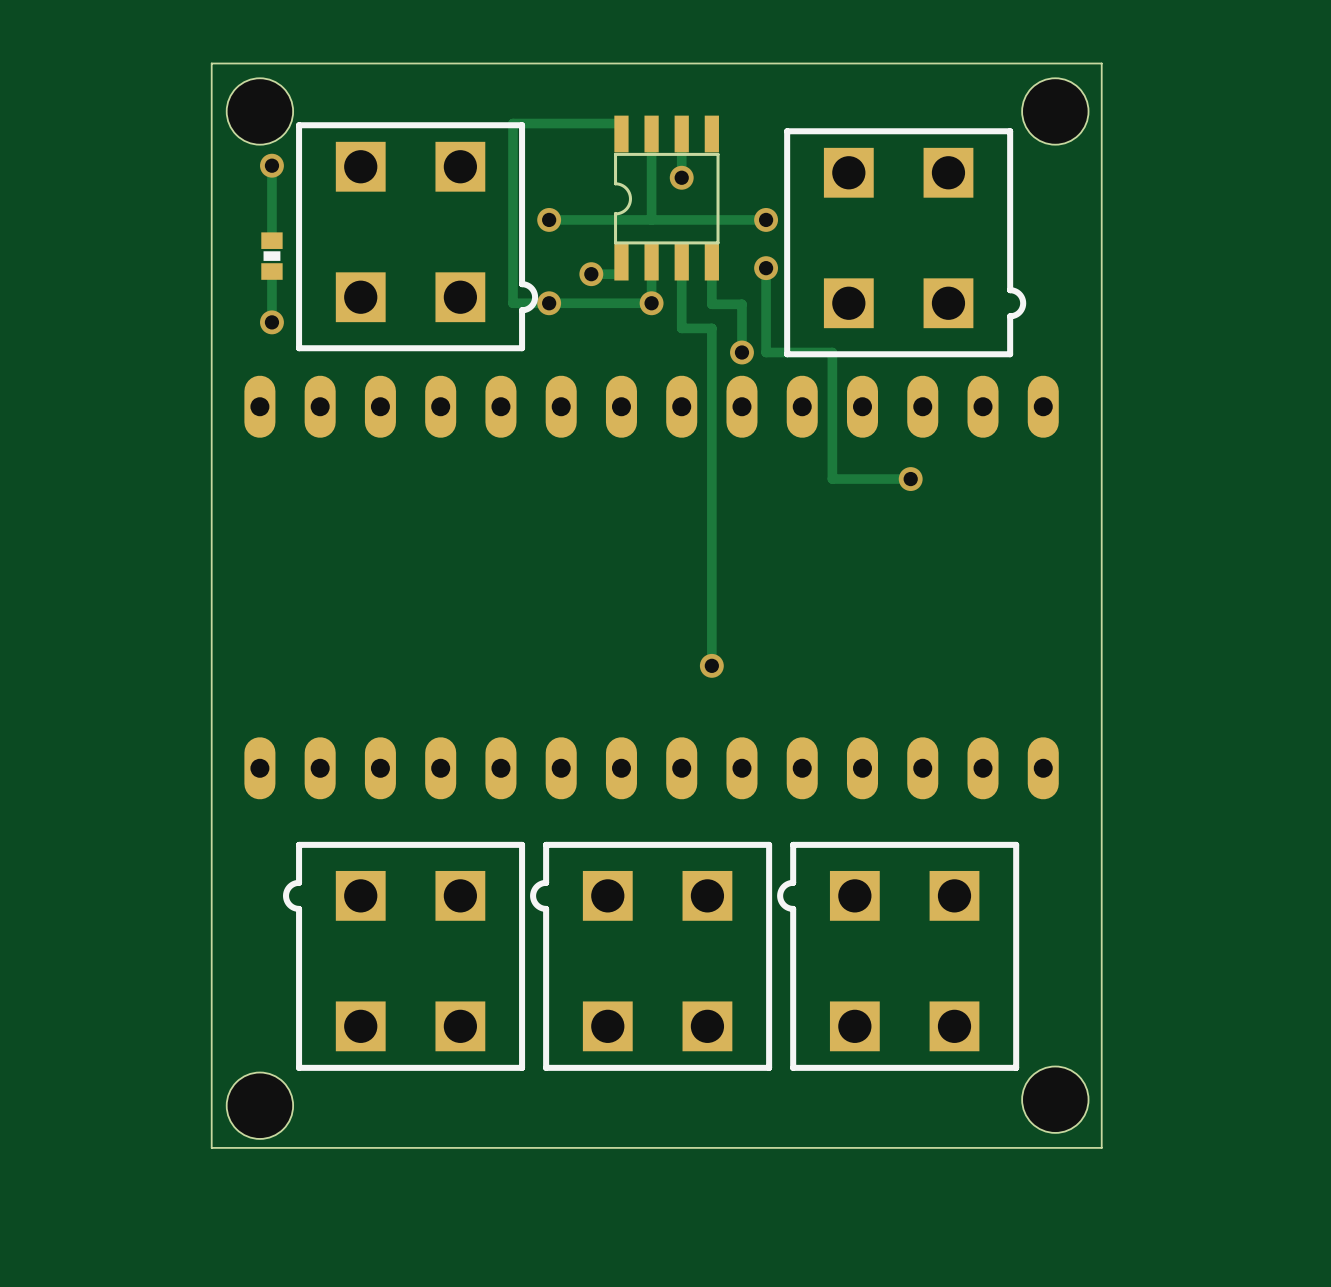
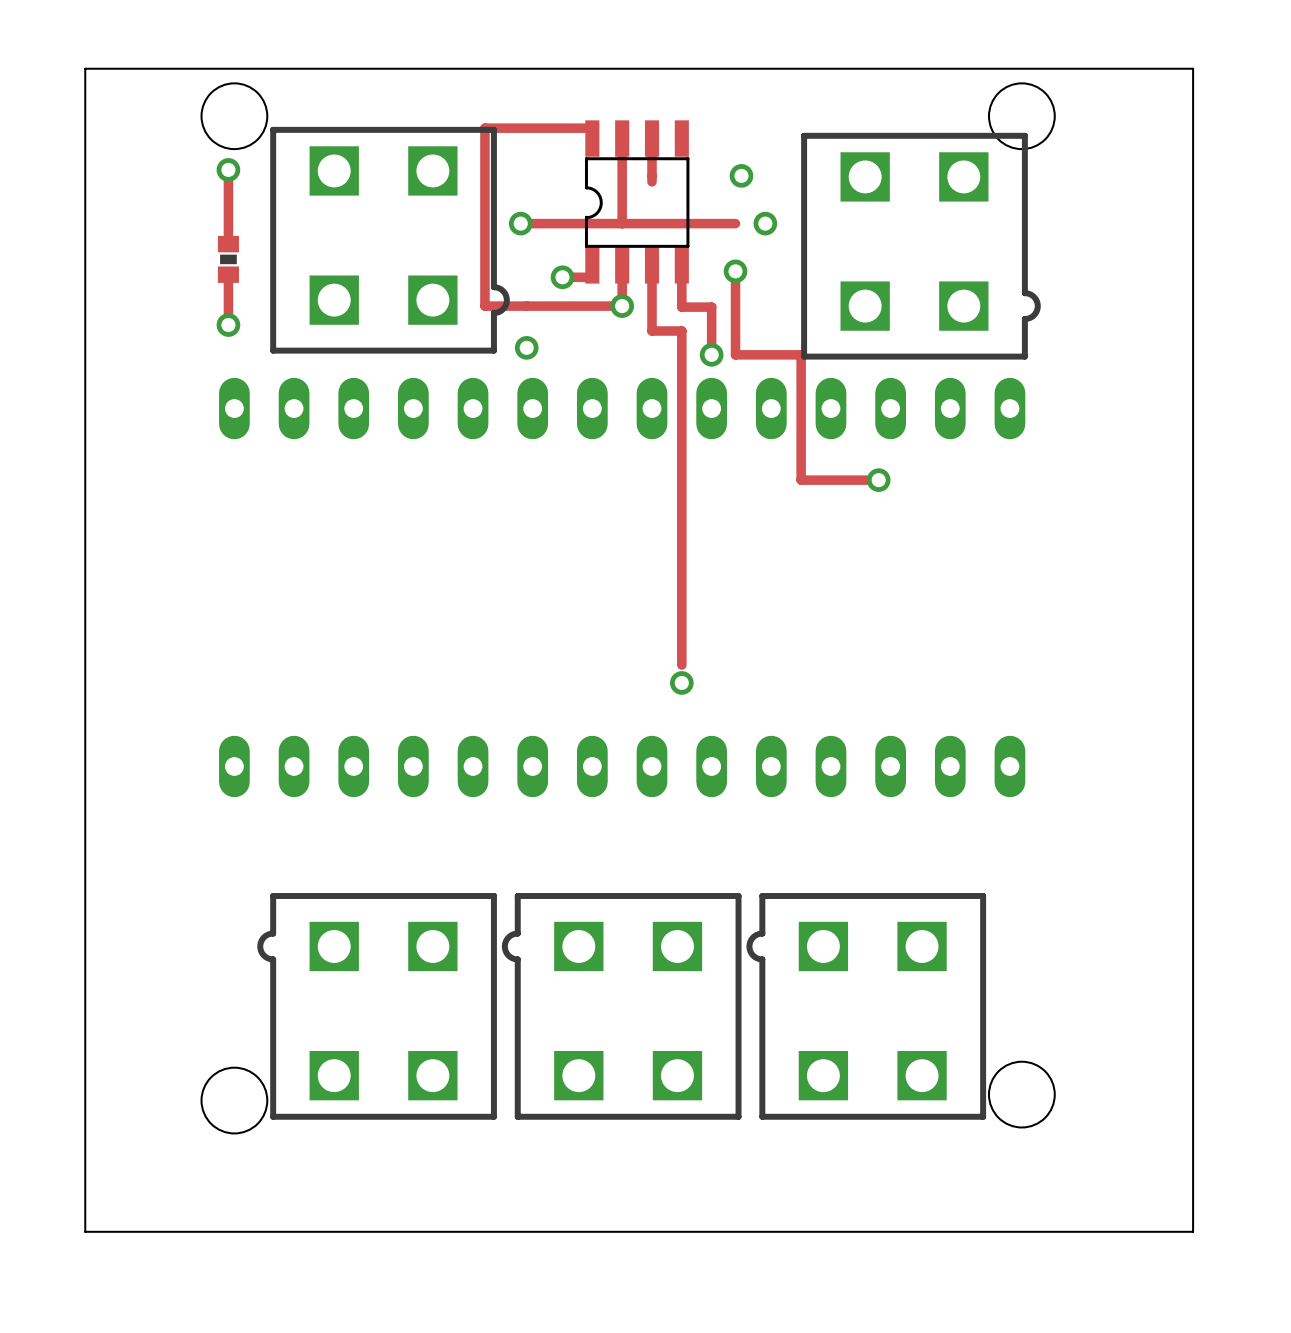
board edge: (211, 63) (211, 1147) (1101, 1147) (1101, 63) -> (186, 68) (85, 68) (85, 1231) (1193, 1231) (1193, 68) (1067, 68)
track: (271, 165) (271, 240) -> (228, 169) (228, 244)
via position: (271, 165) -> (228, 169)
via: none -> (741, 175)
via: (681, 177) -> none
via: (766, 219) -> none
via: none -> (765, 223)
part position: (905, 242) -> (920, 246)
part position: (271, 256) -> (228, 259)
track: (271, 271) (271, 322) -> (228, 274) (228, 325)
via position: (549, 303) -> (526, 347)
via position: (271, 322) -> (228, 325)
via position: (711, 665) -> (681, 682)
part position: (404, 956) -> (377, 1006)
part position: (651, 956) -> (621, 1006)
part position: (898, 956) -> (866, 1006)

